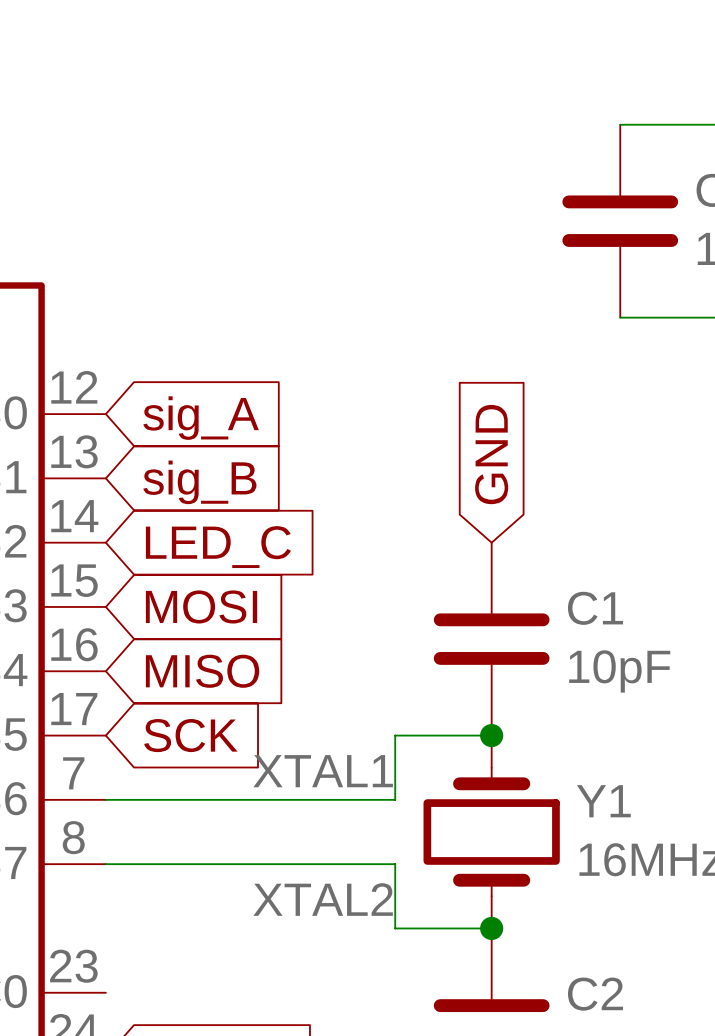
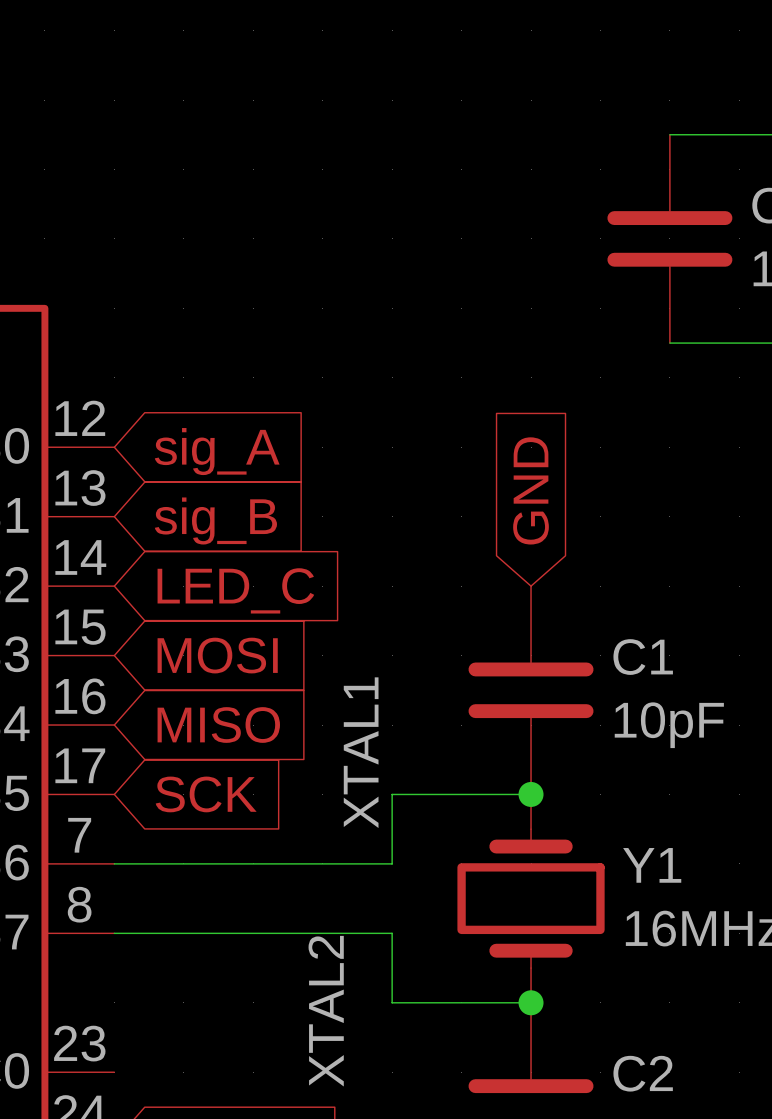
wire: (395, 735) (395, 799) (363, 799) -> (426, 794) (392, 794) (392, 863)
label rotation: 0° (323, 771) -> 90° counterclockwise (361, 752)
wire: (363, 864) (395, 864) (395, 928) -> (392, 933) (392, 1002) (426, 1002)
label rotation: 0° (323, 899) -> 90° counterclockwise (326, 1011)

